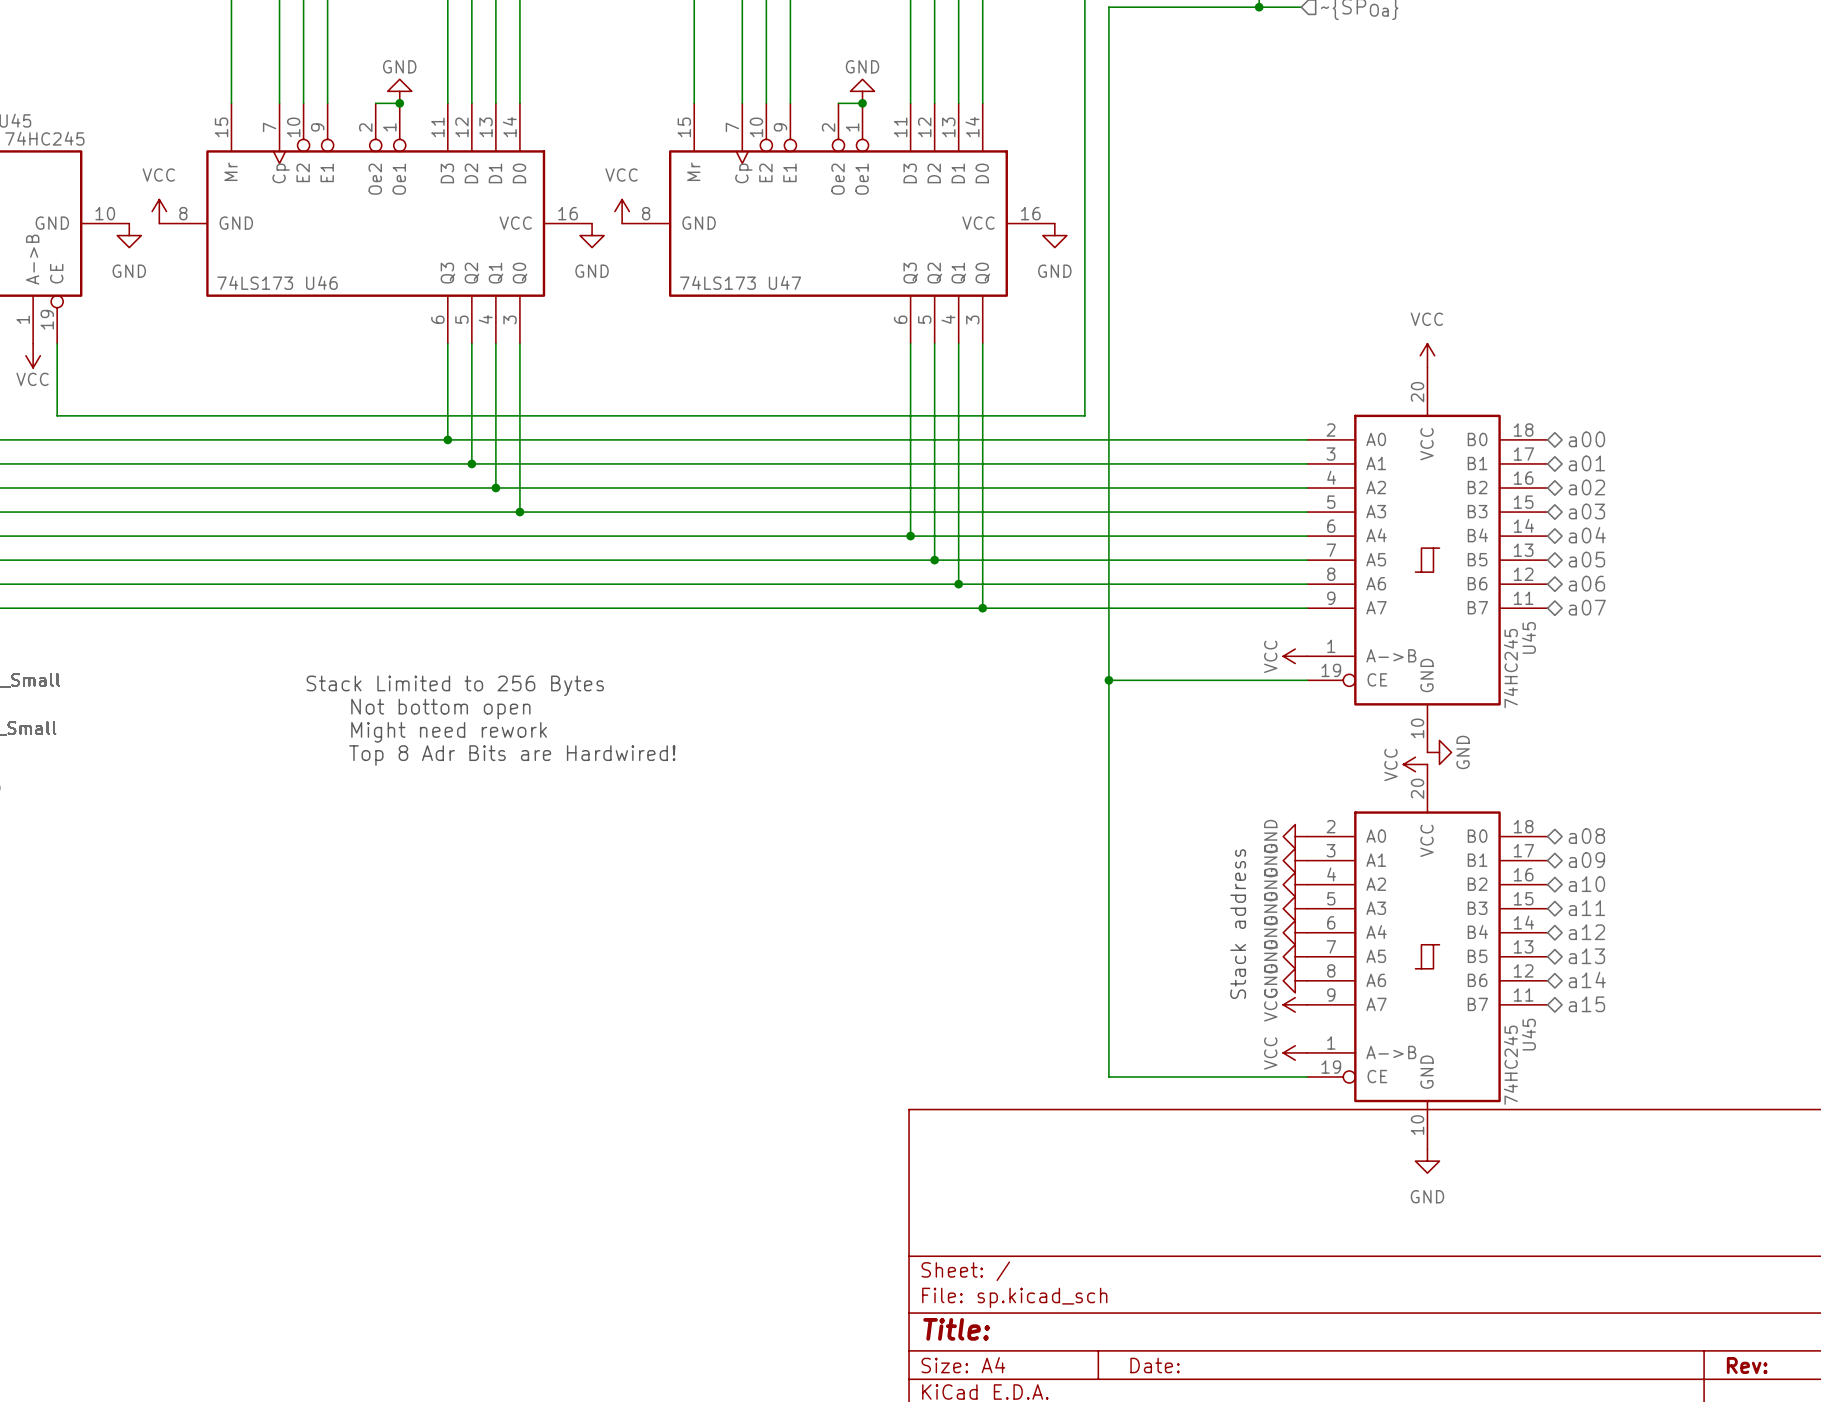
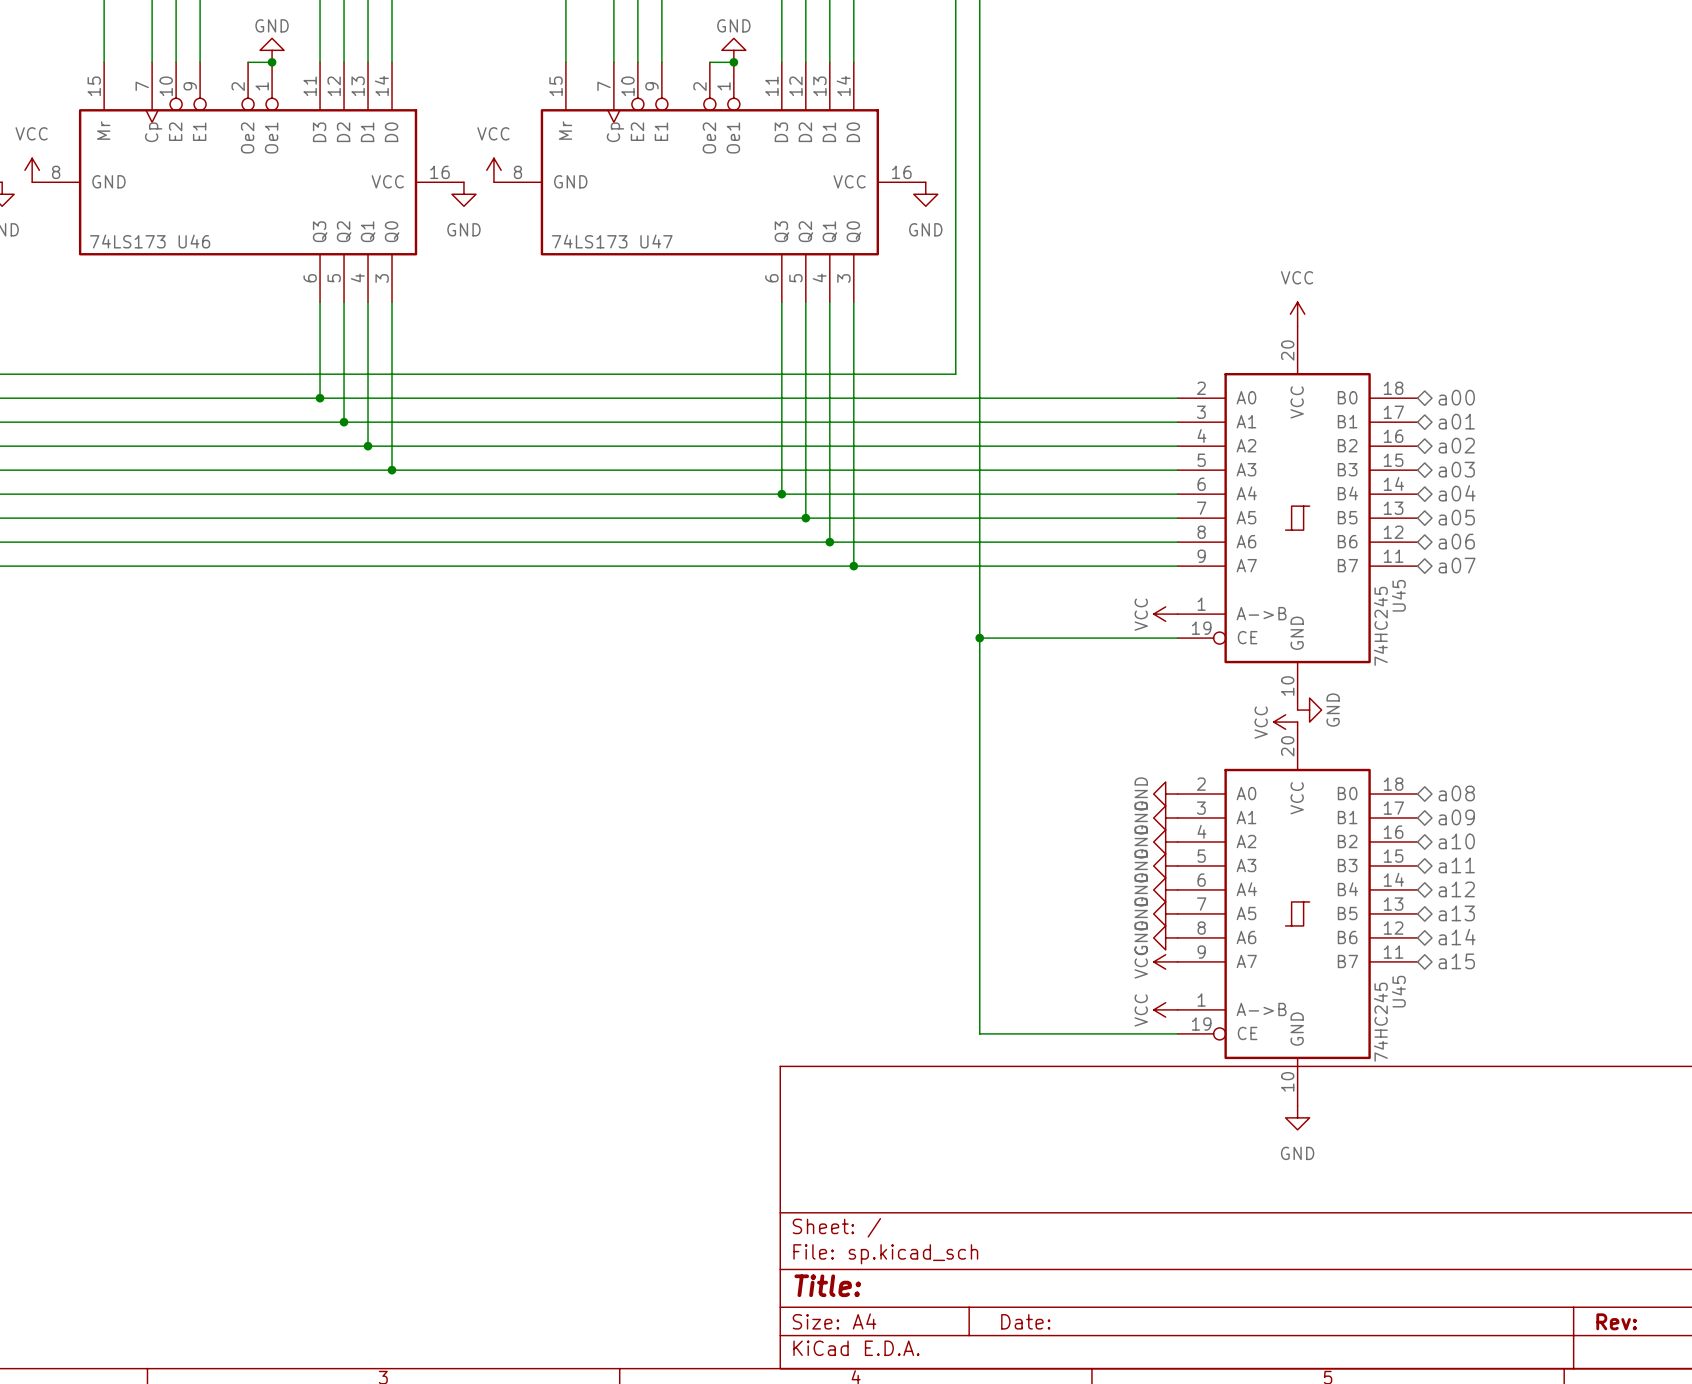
text: Stack Limited to 256 Bytes (455, 685) -> none
text: Not bottom open (440, 709) -> none
text: Might need rework (449, 732) -> none
text: Top 8 Adr Bits are Hardwired! (512, 755) -> none
text: Stack address (1238, 924) -> none

